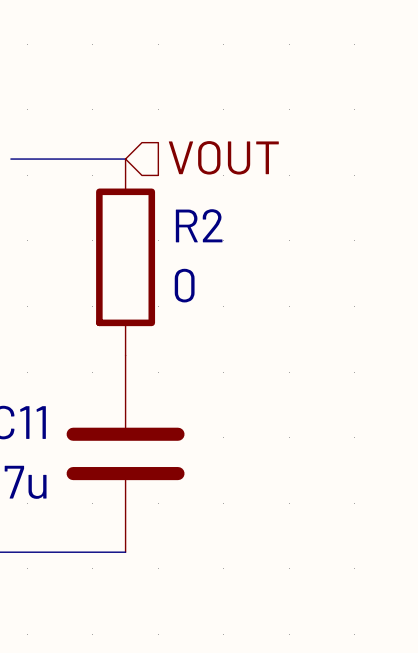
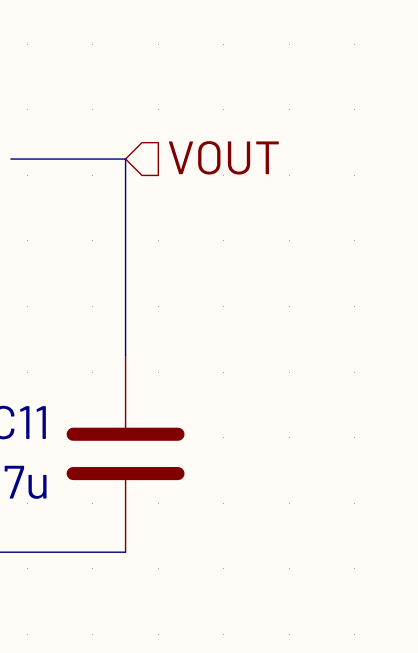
wire: none -> (125, 159) (125, 355)
R2: 0 (125, 257) -> none

